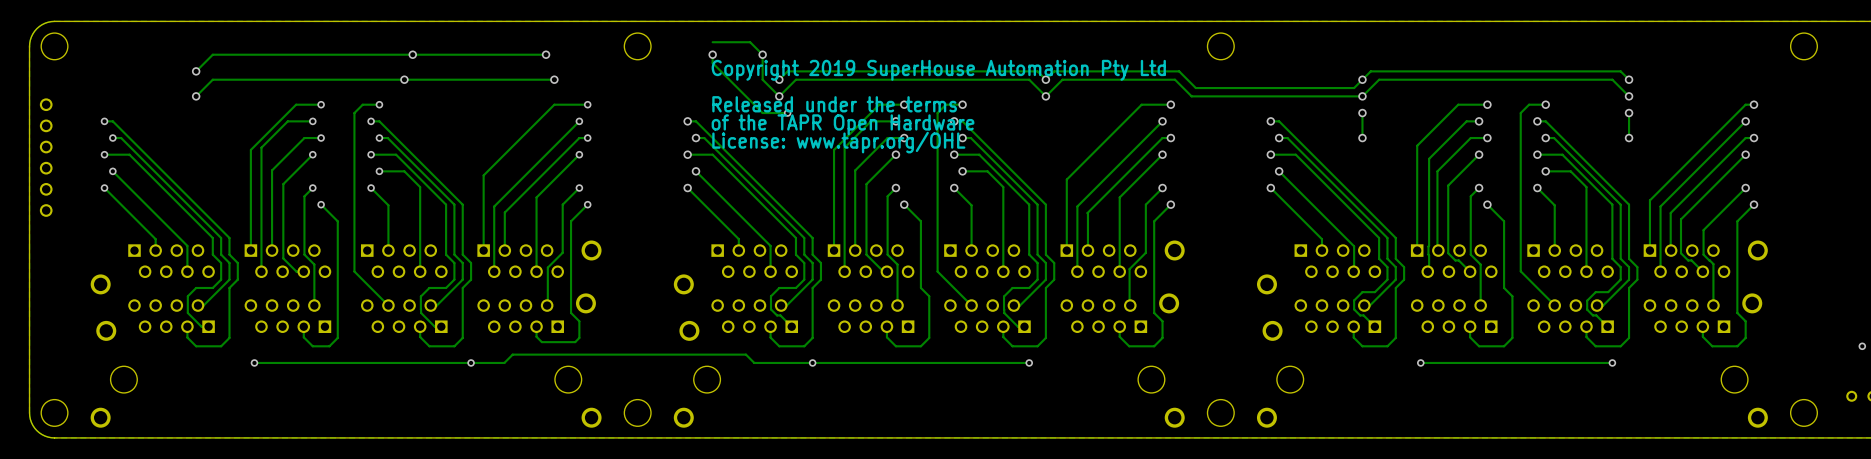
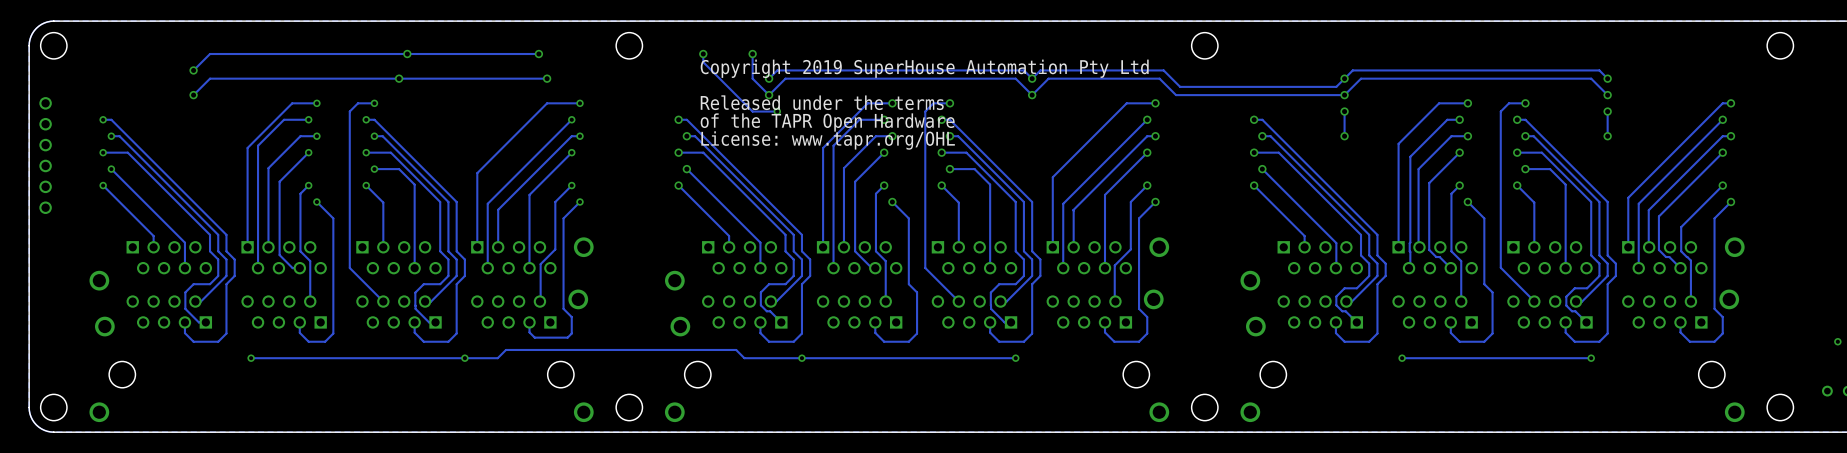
track: (712, 42) (750, 42) (762, 54) -> none

